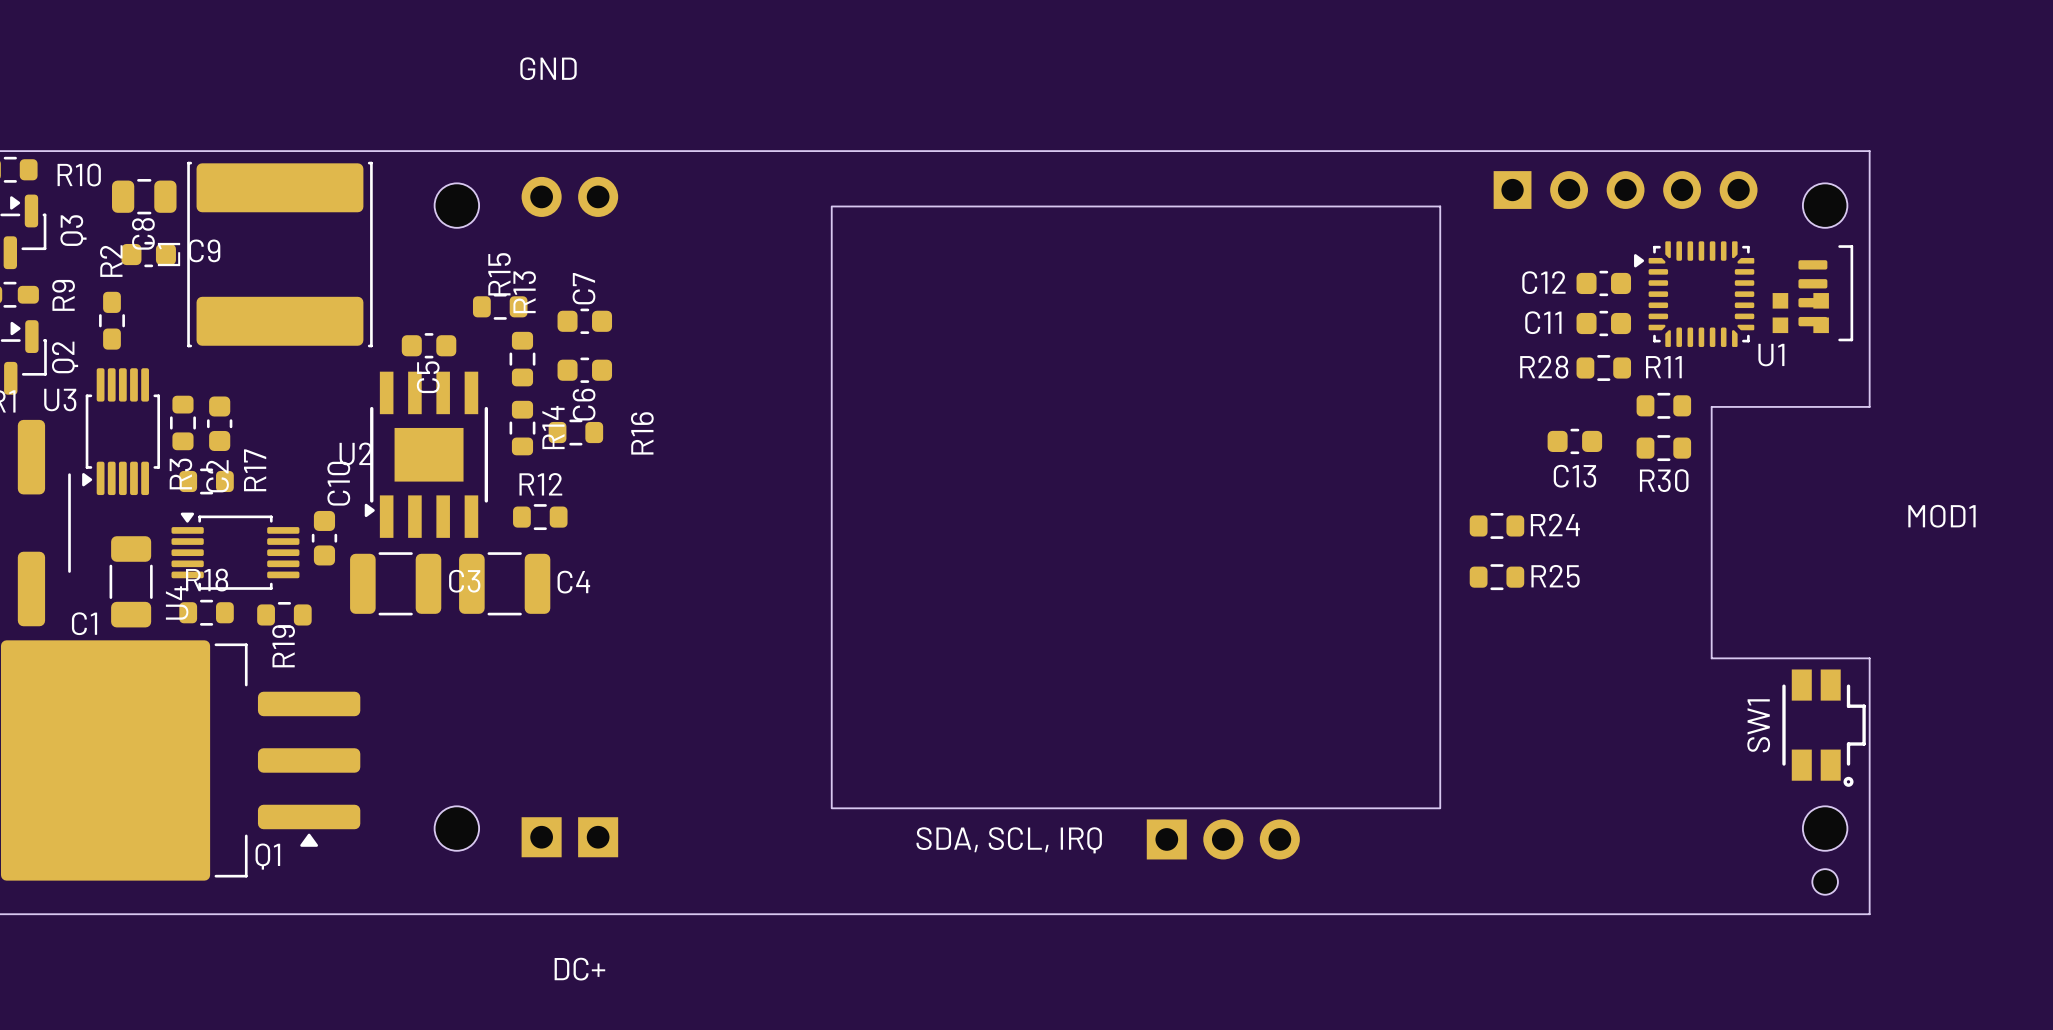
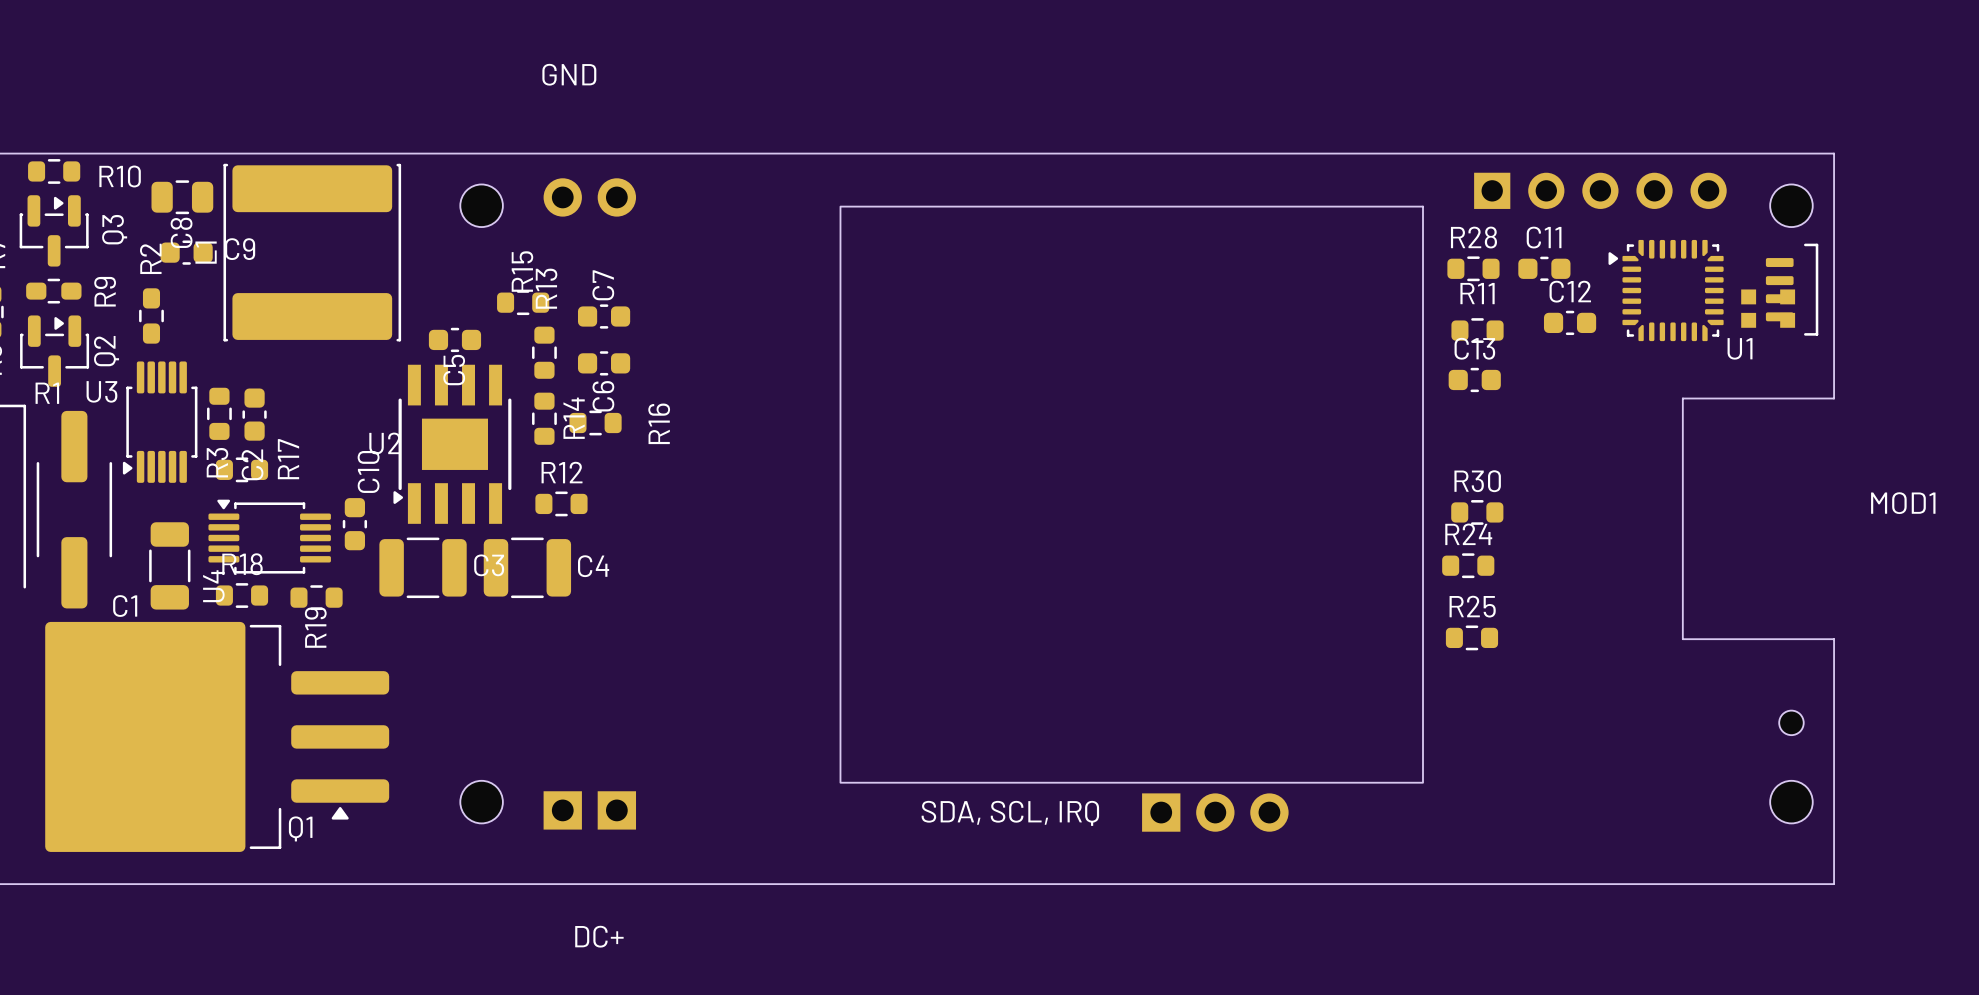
C12 name position: C12 (1543, 282) -> C12 (1570, 291)
C12 position: (1603, 283) -> (1570, 322)
C11 name position: C11 (1543, 322) -> C11 (1544, 237)
C11 position: (1603, 323) -> (1544, 268)
R28 name position: R28 (1544, 367) -> R28 (1473, 237)
R28 position: (1603, 368) -> (1473, 268)
R11 position: (1663, 405) -> (1477, 330)
C13 position: (1574, 441) -> (1474, 379)
R30: (1663, 448) -> none
C13 name position: C13 (1574, 476) -> C13 (1474, 348)
R24 name: R24 (1555, 525) -> R30 (1477, 481)
R25 name position: R25 (1555, 576) -> R25 (1472, 606)
R25 position: (1496, 577) -> (1471, 637)
R24: none -> (1468, 565)
SW1: (1824, 728) -> none
part position: (1825, 881) -> (1791, 722)

